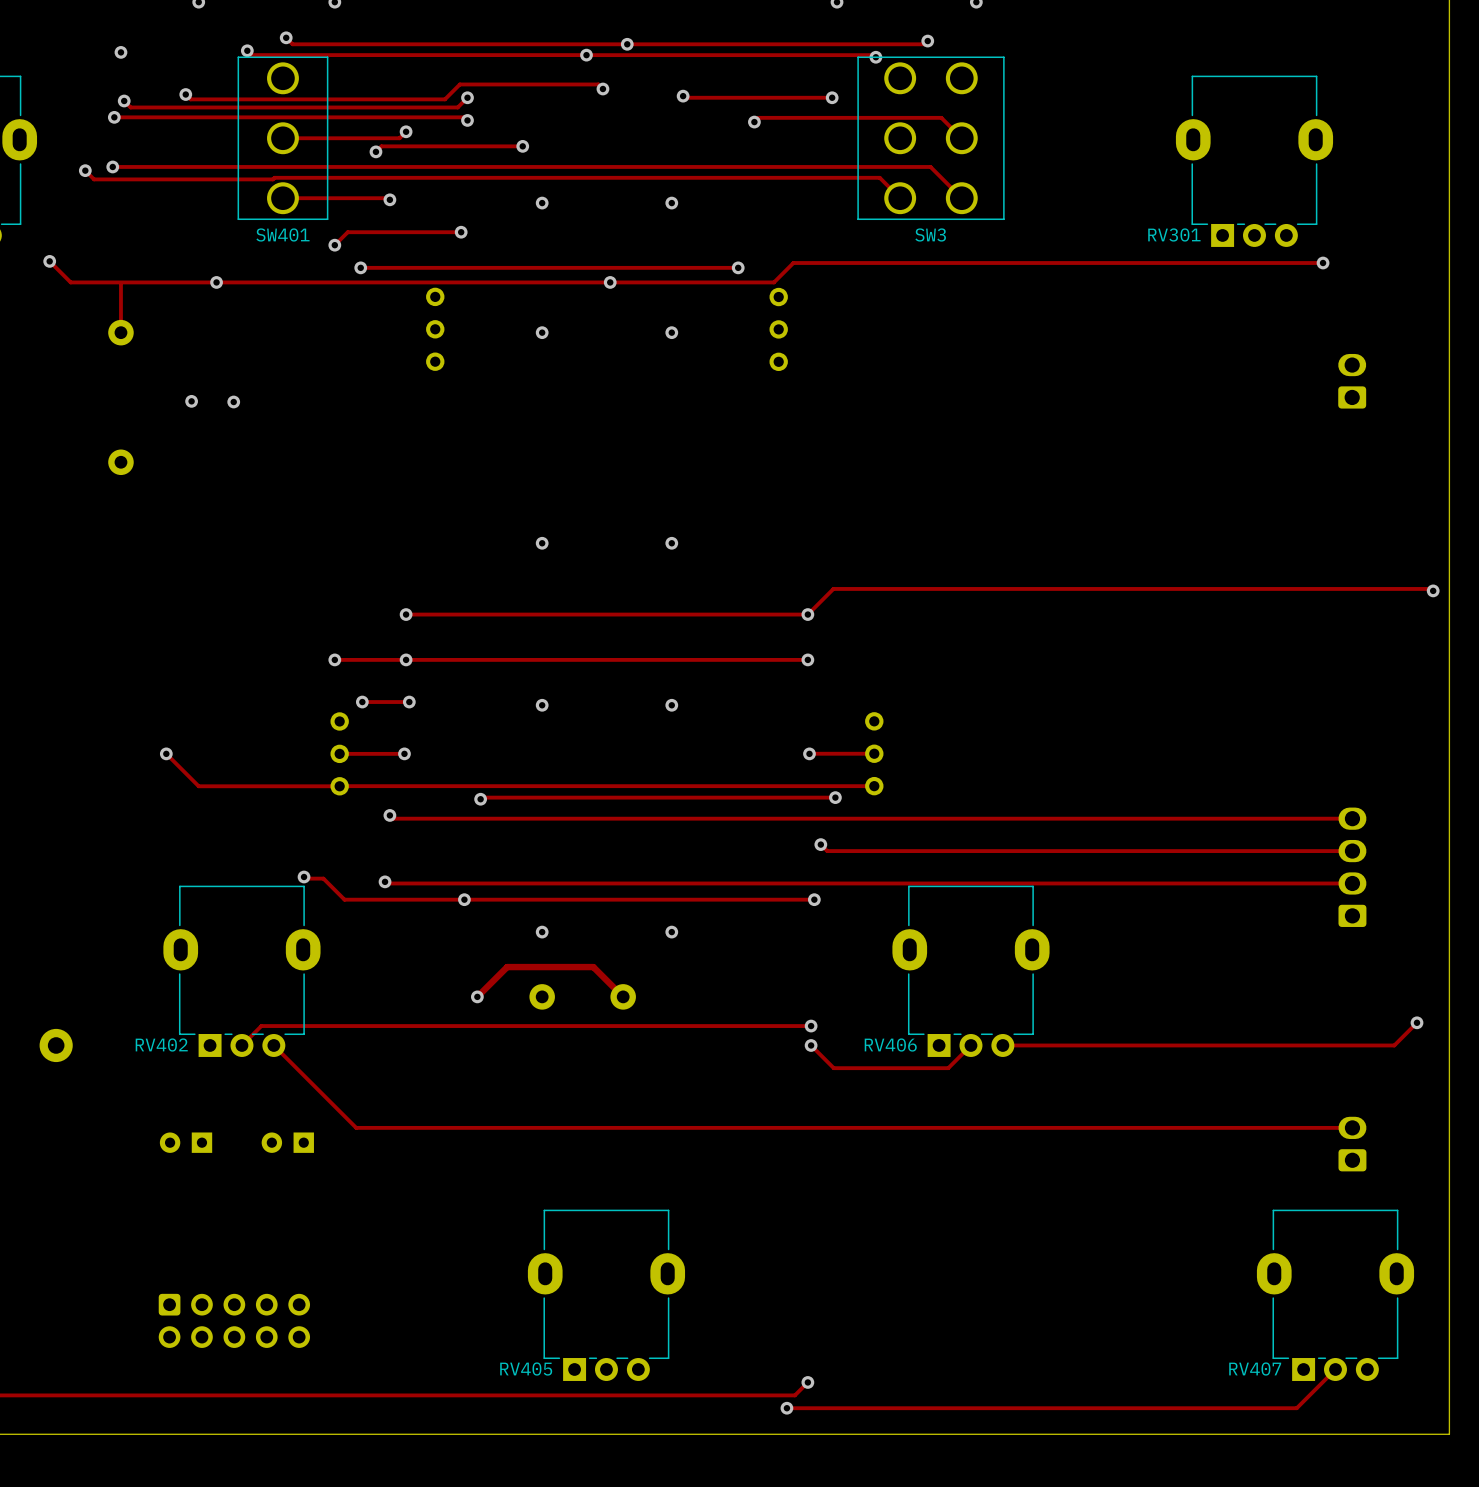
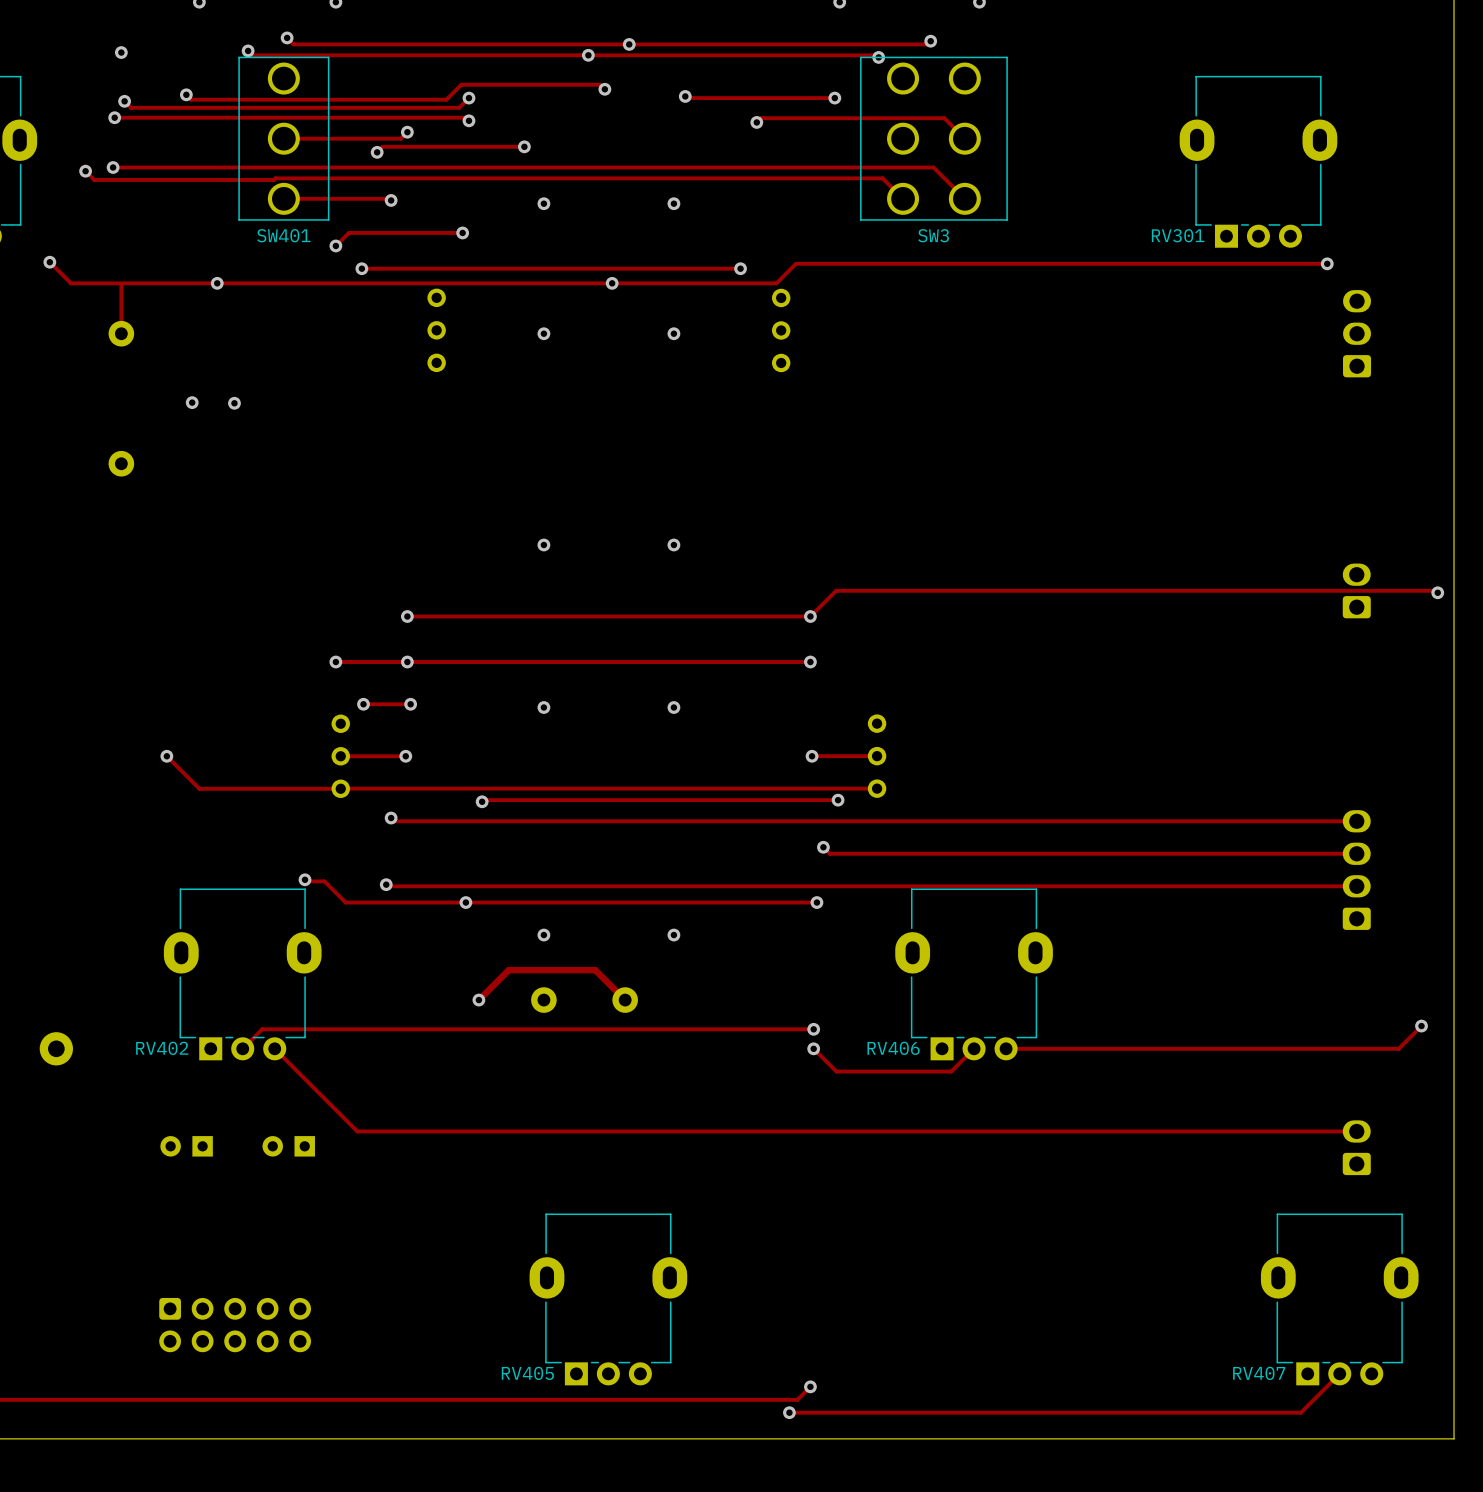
part: none -> (1357, 333)
part position: (1352, 381) -> (1356, 590)

